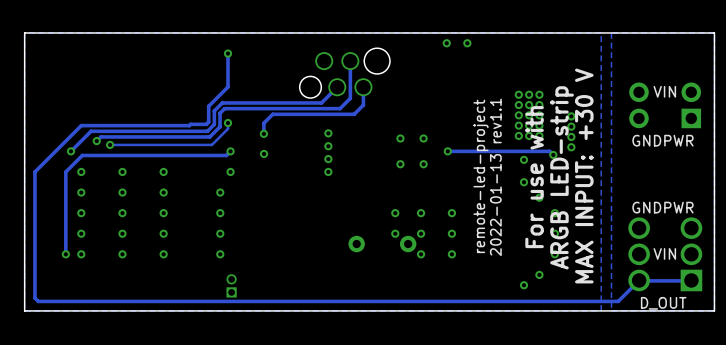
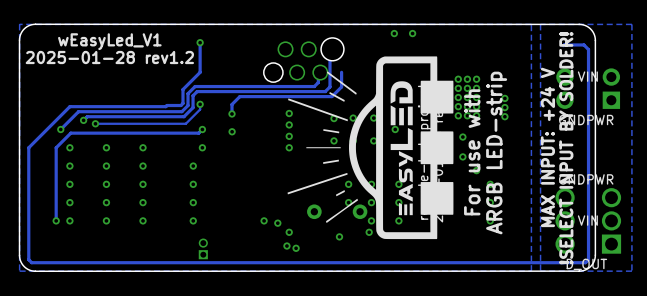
board edge: (714, 32) (714, 310) (24, 310) (24, 32) (714, 32) -> (35, 24) (579, 24) (586, 25) (592, 31) (595, 40) (595, 255) (593, 262) (587, 268) (579, 271) (35, 271) (28, 269) (21, 263) (19, 255) (19, 40) (24, 28) (35, 24)
text: none -> wEasyLed_V1 (109, 41)
track: (350, 61) (350, 98) (340, 108) -> (329, 49) (329, 86) (325, 91) (299, 91)
drawing: none -> [287, 56, 454, 240]
text: none -> 2025-01-28 rev1.2 (109, 57)
track: (337, 87) (321, 102) -> (318, 72) (318, 82) (314, 86) (283, 86)
track: (363, 87) (363, 105) (354, 114) -> (341, 72) (341, 86) (331, 96) (312, 96)
via: none -> (334, 118)
via: (571, 147) -> none
track: (447, 151) (549, 151) (553, 154) -> none
via: (553, 154) -> none
via: none -> (334, 140)
text: none -> MAX INPUT: +24 V (547, 147)
text: none -> !SELECT INPUT BY SOLDER! (566, 148)
text: MAX INPUT: +30 V (584, 176) -> none
via: none -> (264, 220)
via: none -> (277, 223)
via: none -> (289, 232)
via: none -> (369, 232)
via: none -> (339, 236)
via: (539, 274) -> none
track: (691, 280) (638, 280) (618, 301) -> (563, 45) (583, 44) (588, 49) (588, 259) (585, 262) (546, 262)
via: none -> (286, 246)
via: none -> (296, 248)
via: (523, 285) -> none

